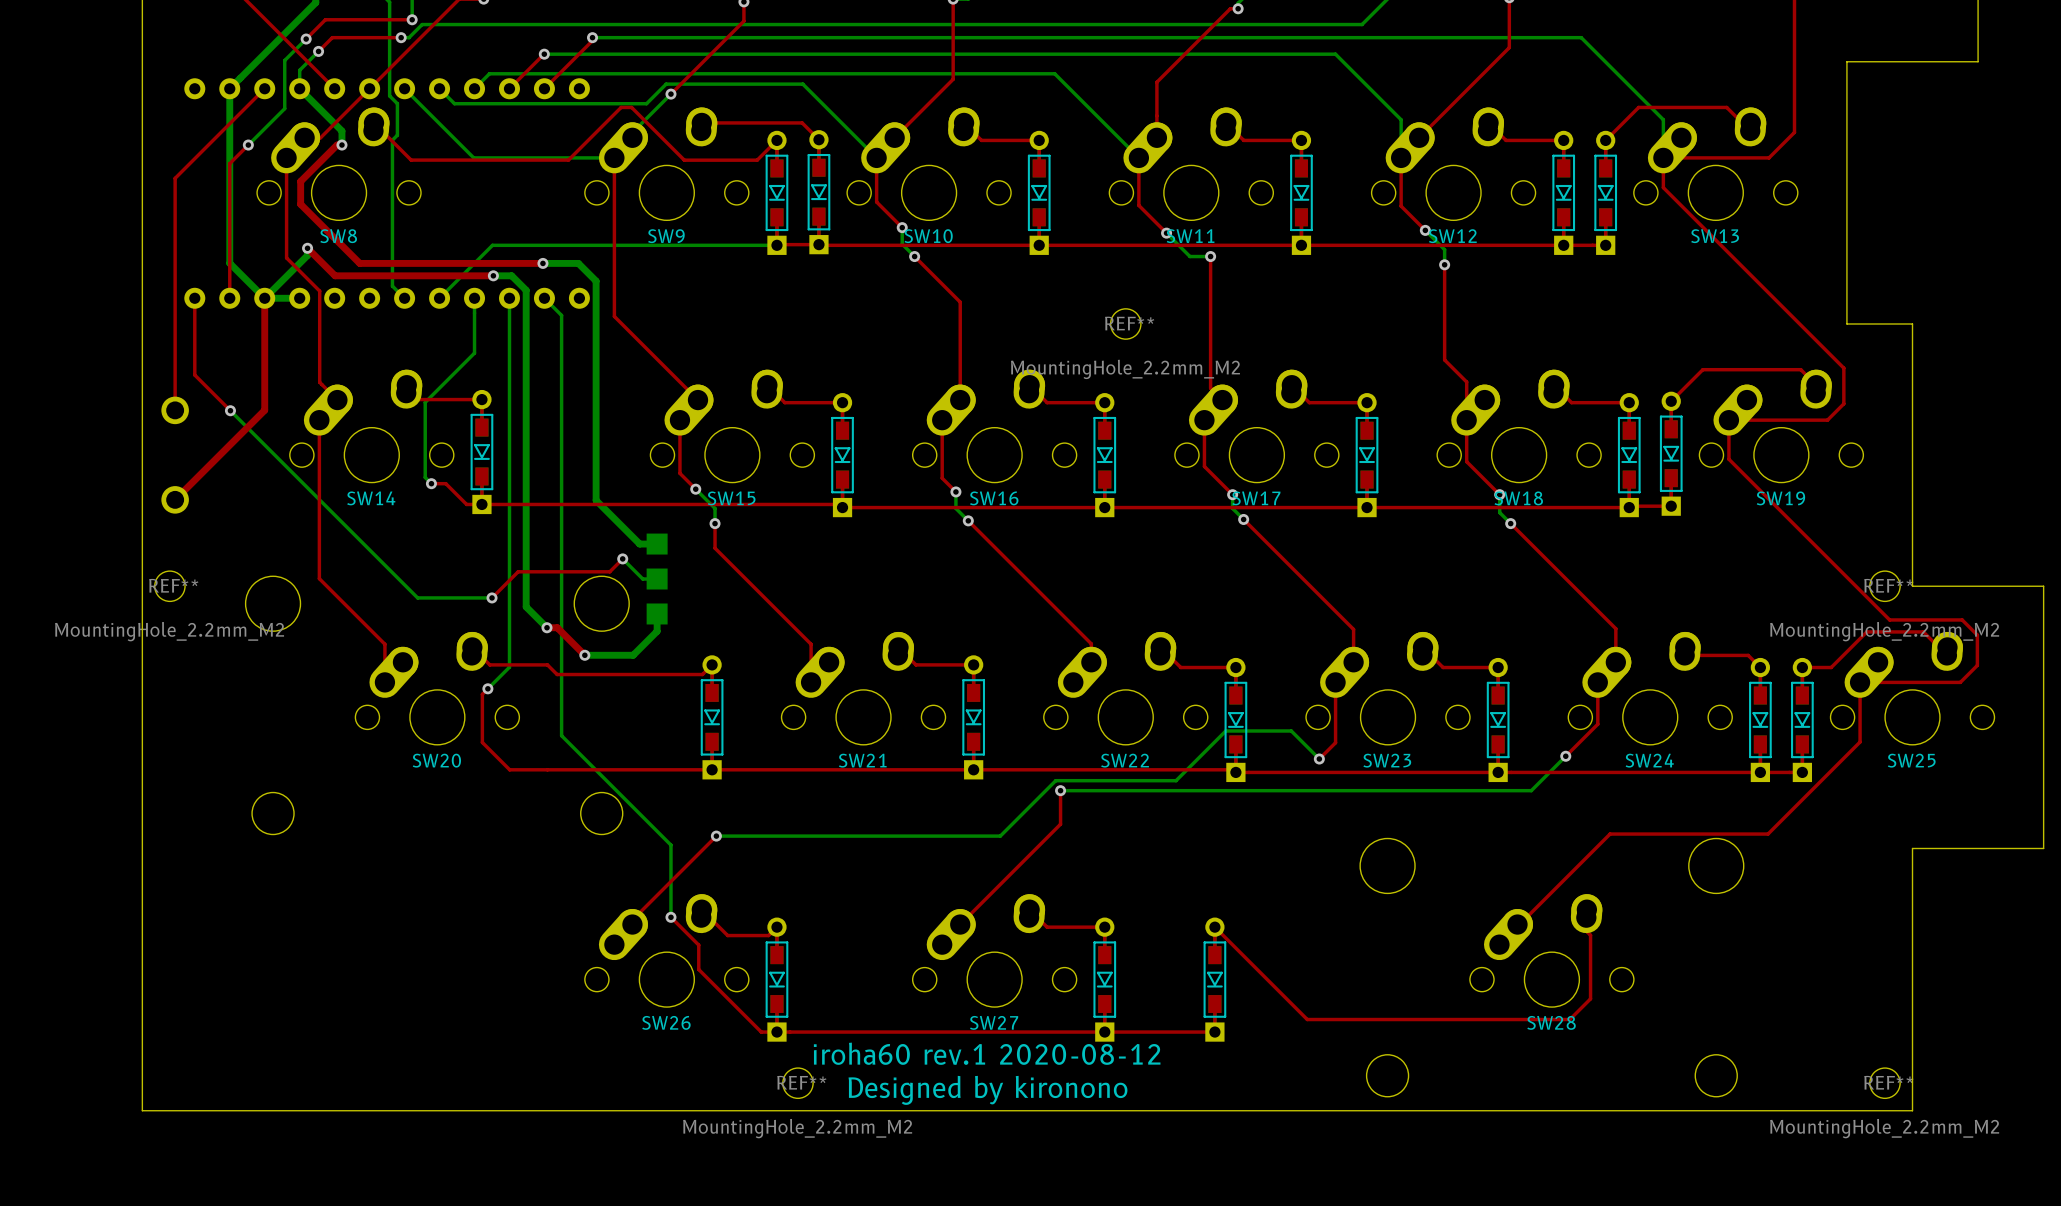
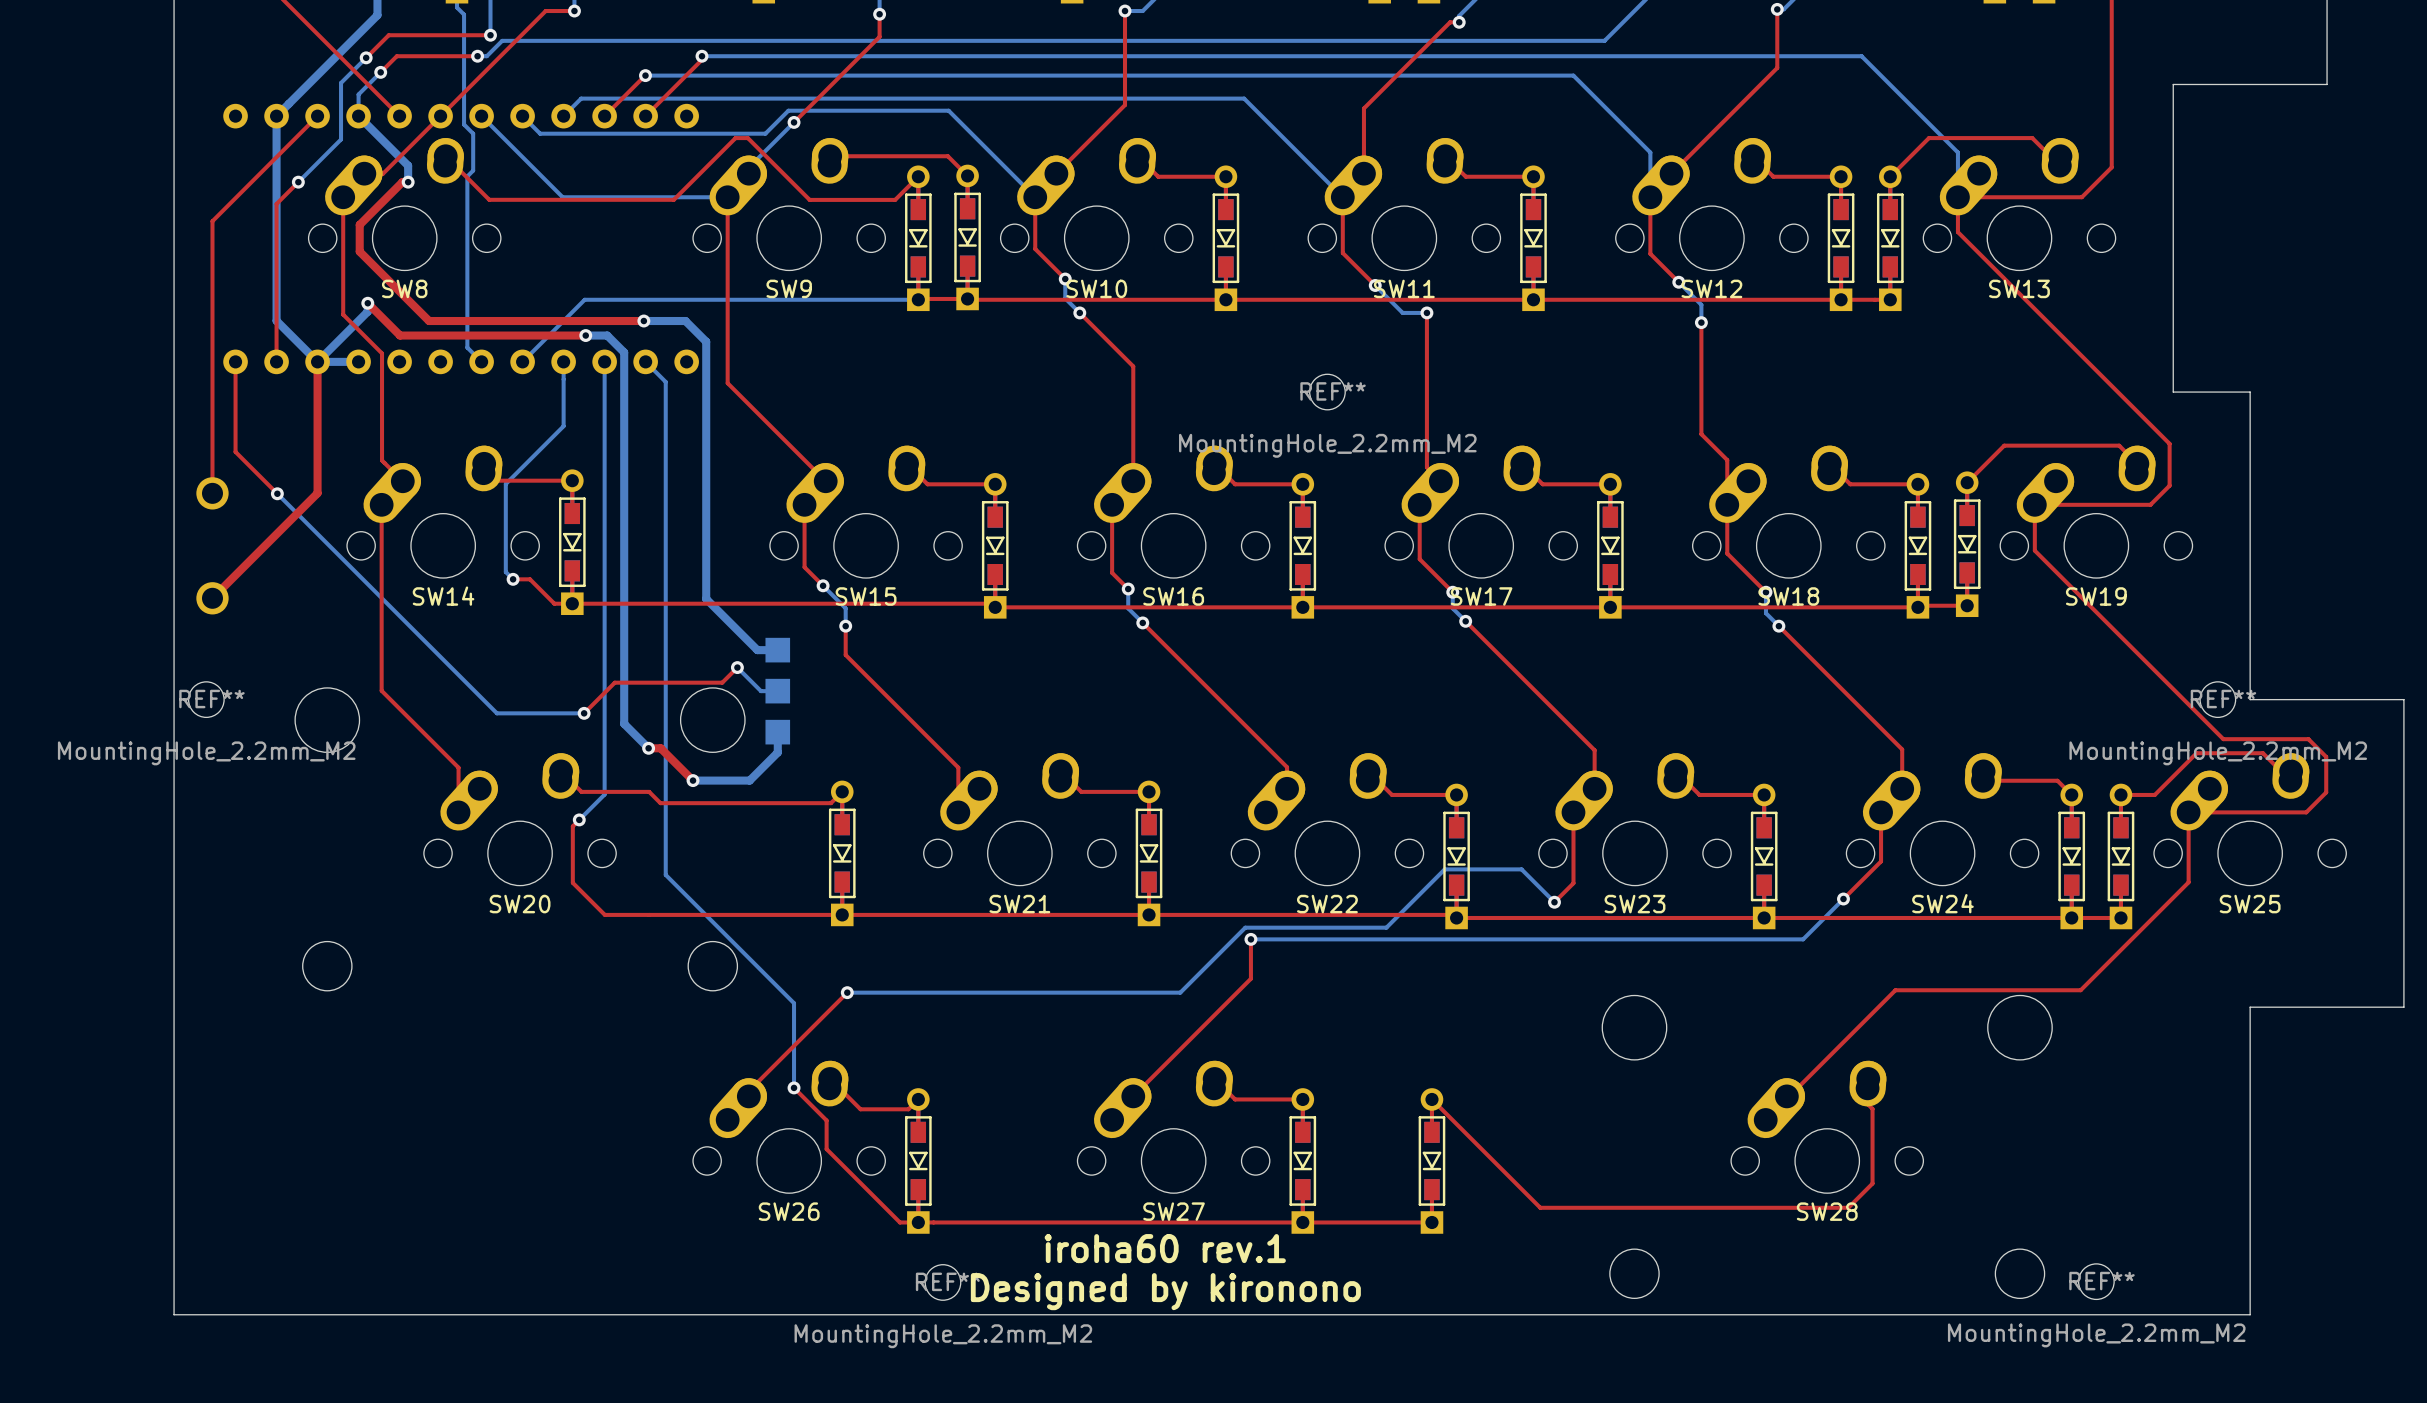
text: iroha60 rev.1 2020-08-12 (987, 1053) -> iroha60 rev.1 (1165, 1248)
REF** position: (1884, 1083) -> (2096, 1281)

